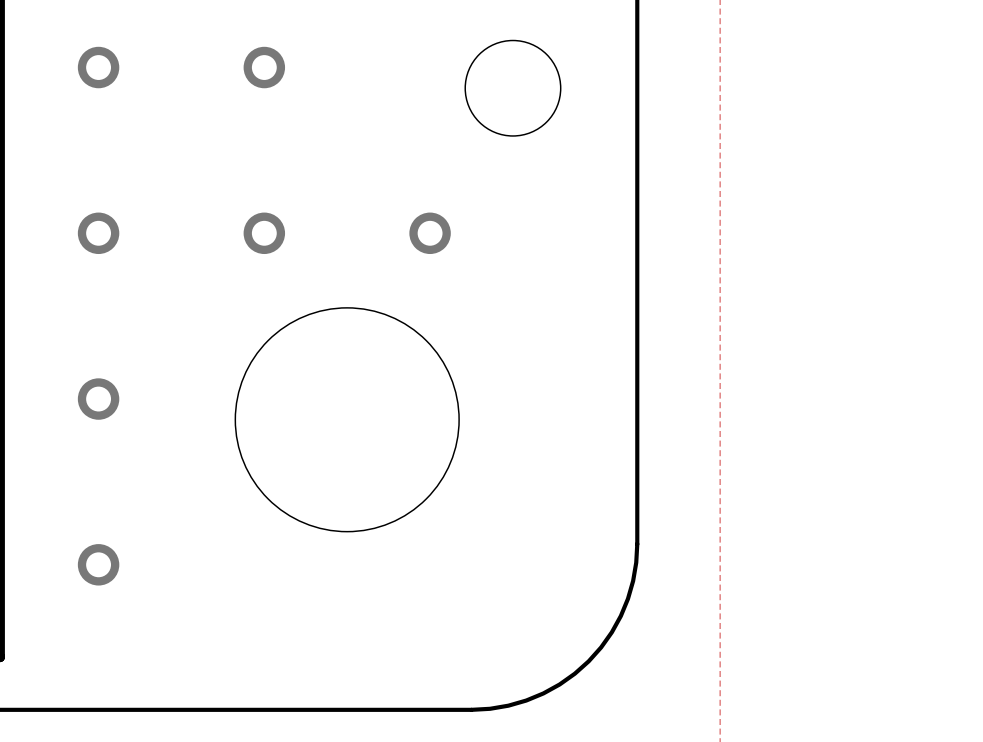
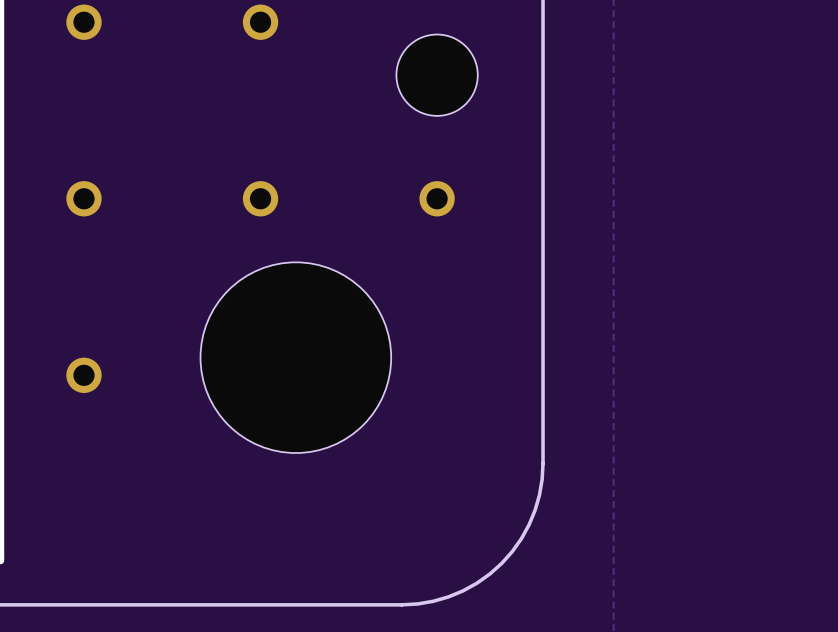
via position: (98, 67) -> (83, 22)
via position: (264, 67) -> (260, 22)
via position: (264, 233) -> (260, 198)
via: (430, 233) -> none
via: none -> (437, 198)
via position: (98, 399) -> (83, 375)
via: (98, 564) -> none

